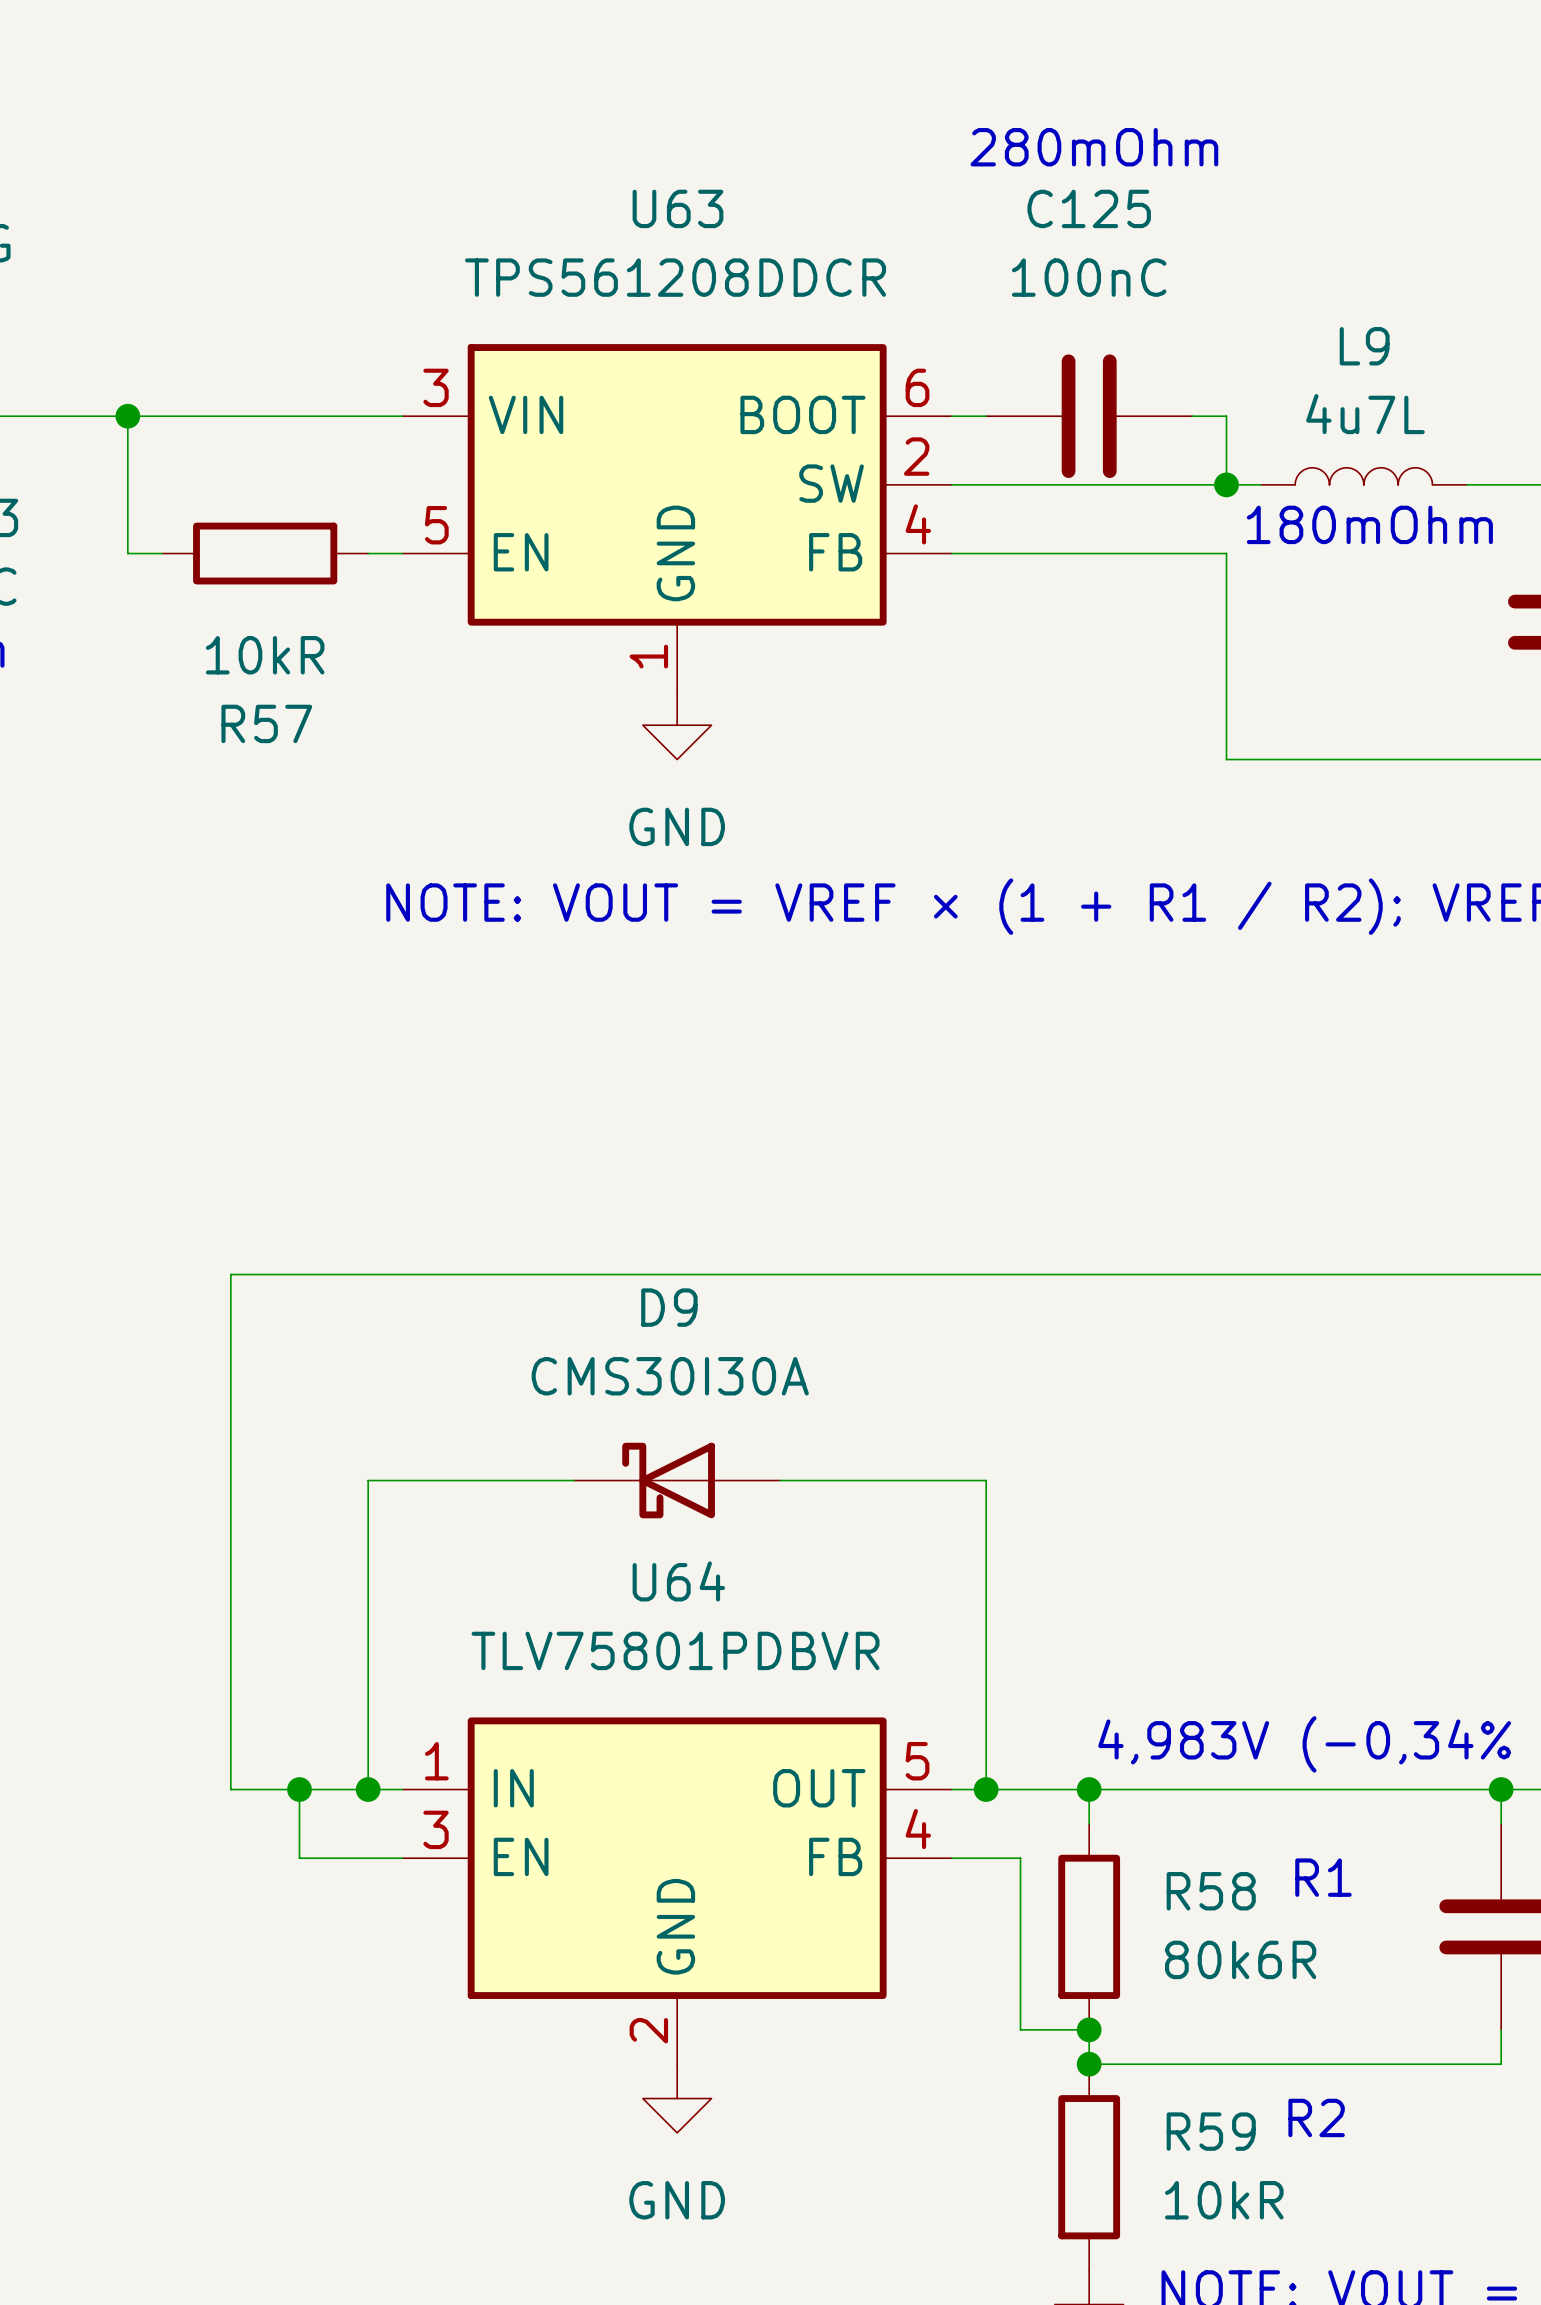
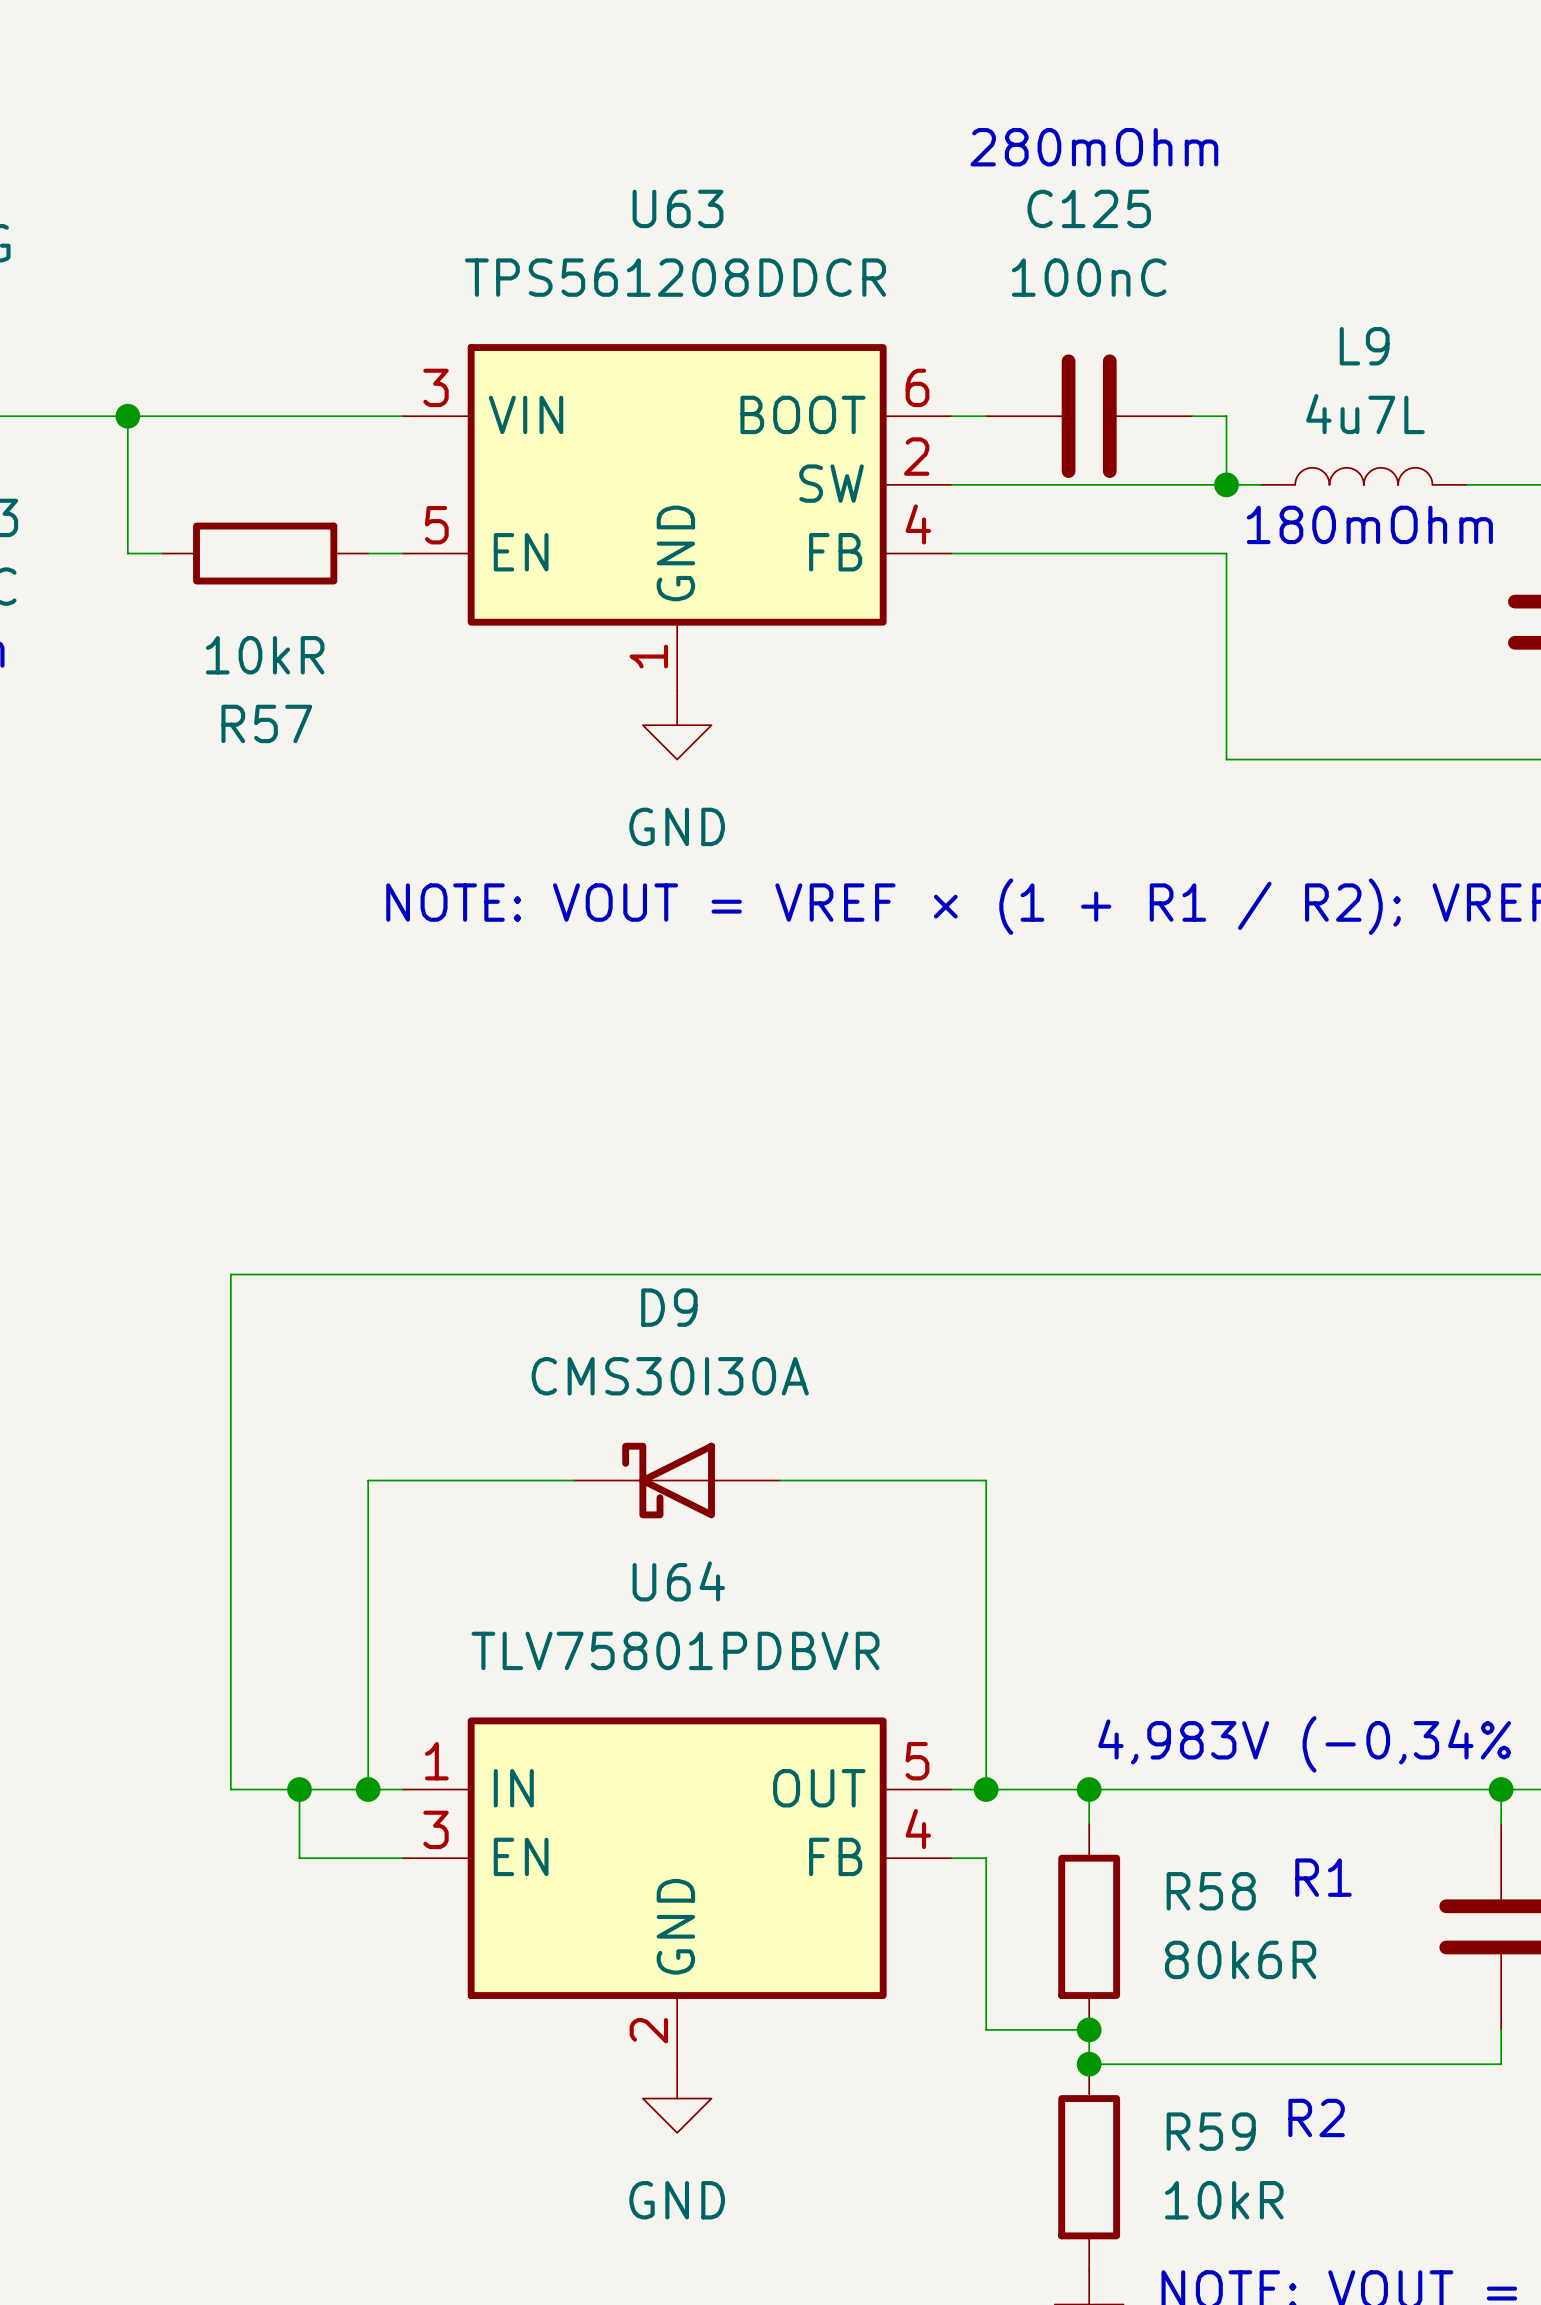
wire: (986, 1858) (1020, 1858) (1020, 2029) -> (986, 1858) (986, 2029) (1020, 2029)

